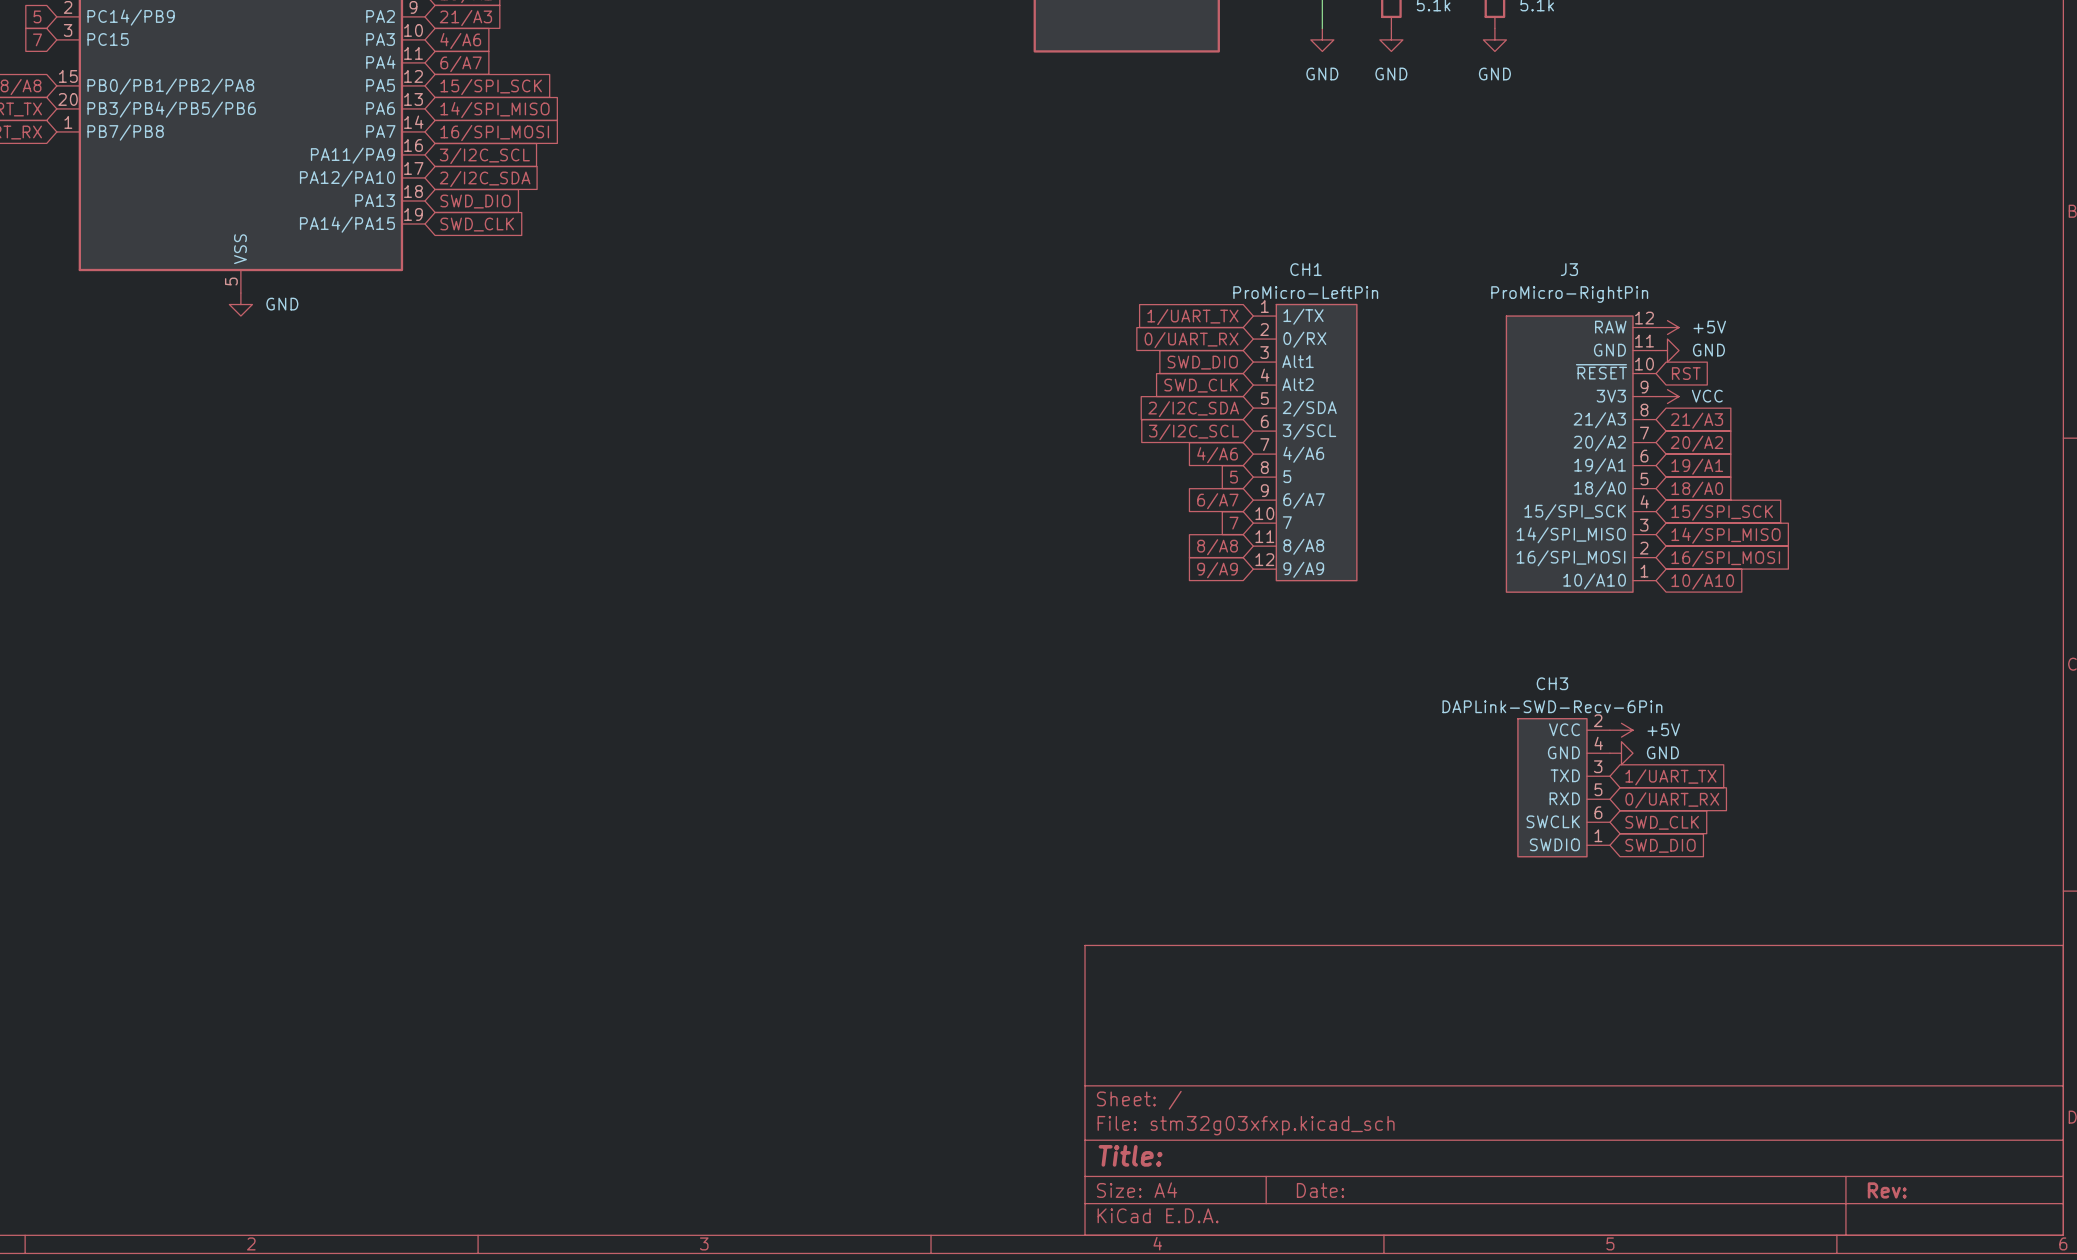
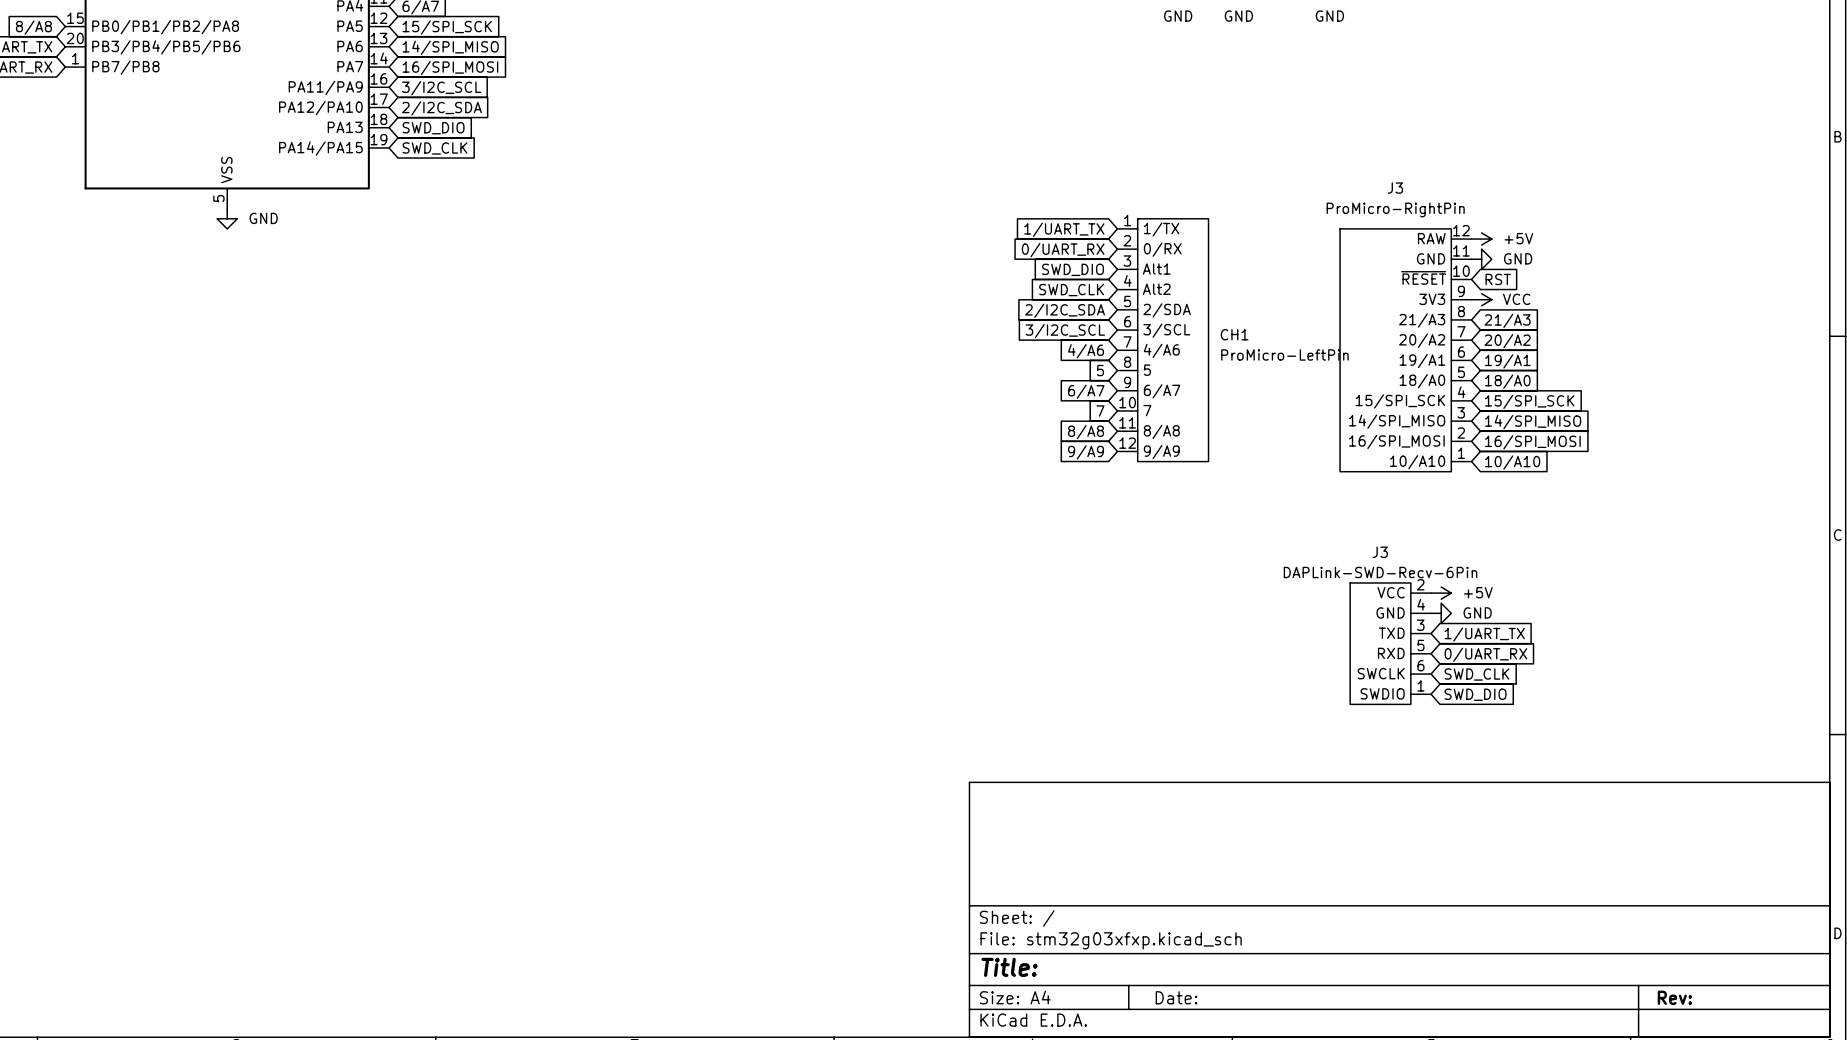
CH1 name position: CH1 (1306, 269) -> CH1 (1234, 334)
CH1 value position: ProMicro-LeftPin (1305, 292) -> ProMicro-LeftPin (1284, 354)
CH3 name: CH3 (1552, 683) -> J3 (1380, 552)

